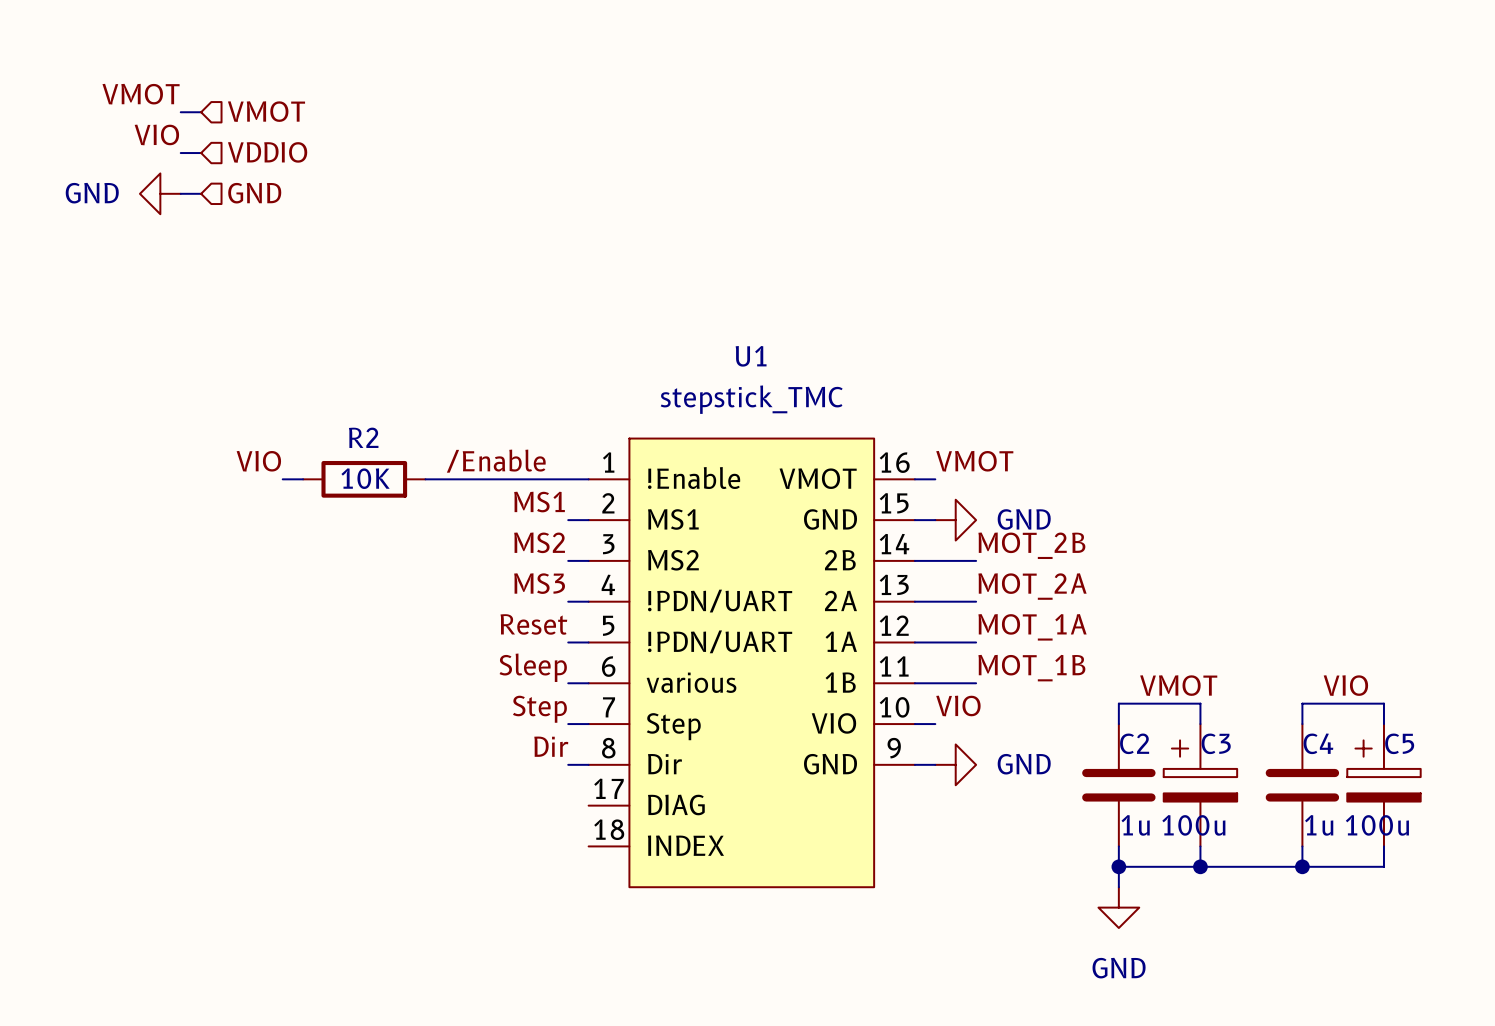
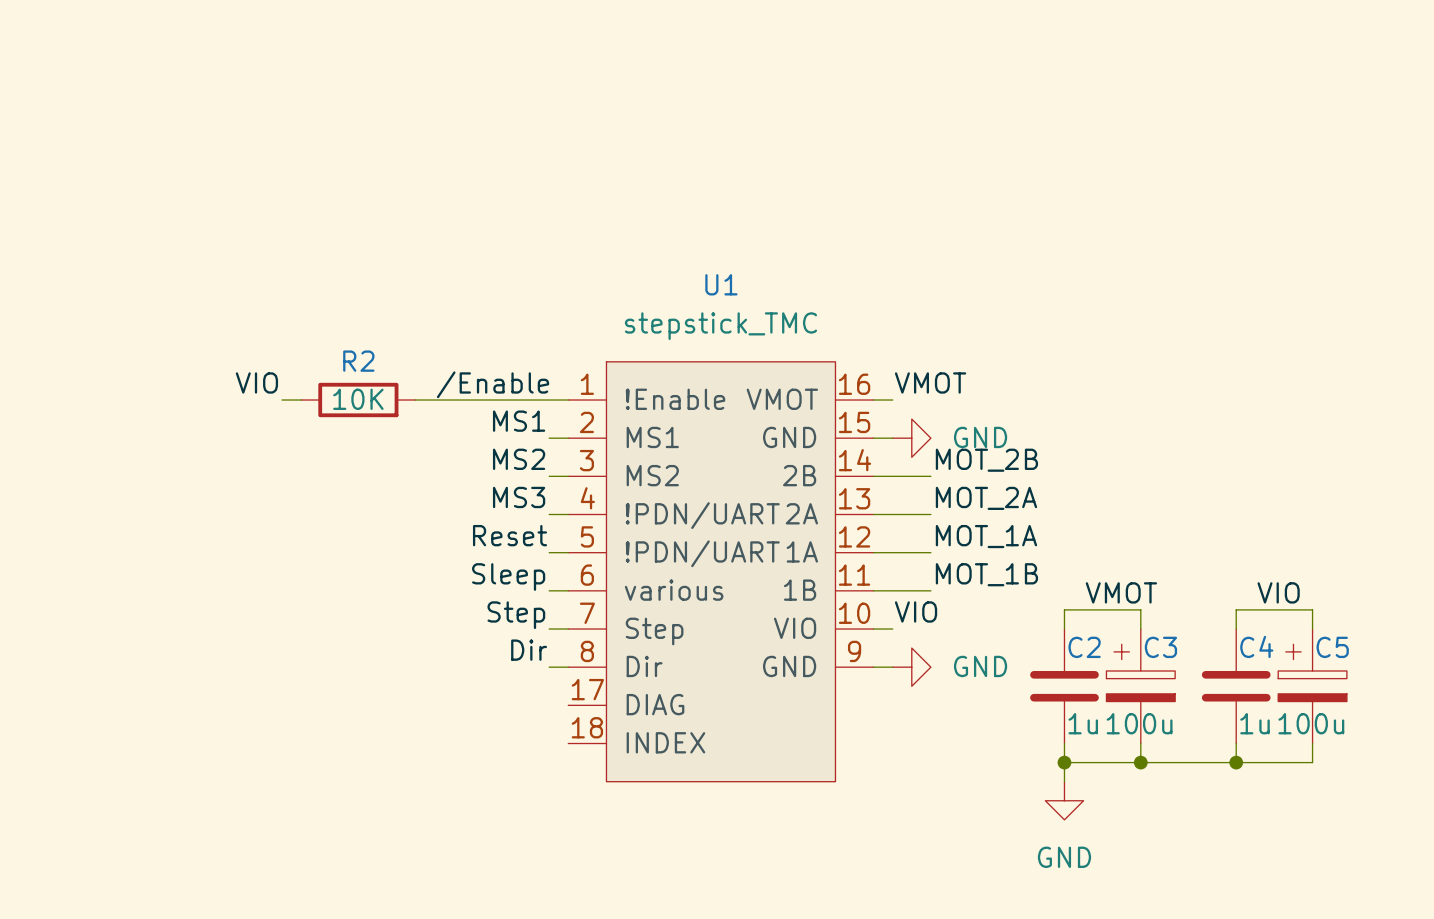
label: VMOT (141, 94) -> none
hierarchical label: VMOT (266, 111) -> none
wire: (180, 112) (201, 112) -> none
label: VIO (156, 134) -> none
hierarchical label: VDDIO (267, 152) -> none
wire: (180, 153) (201, 153) -> none
power symbol: GND (160, 193) -> none
wire: (180, 193) (201, 193) -> none
hierarchical label: GND (254, 193) -> none

